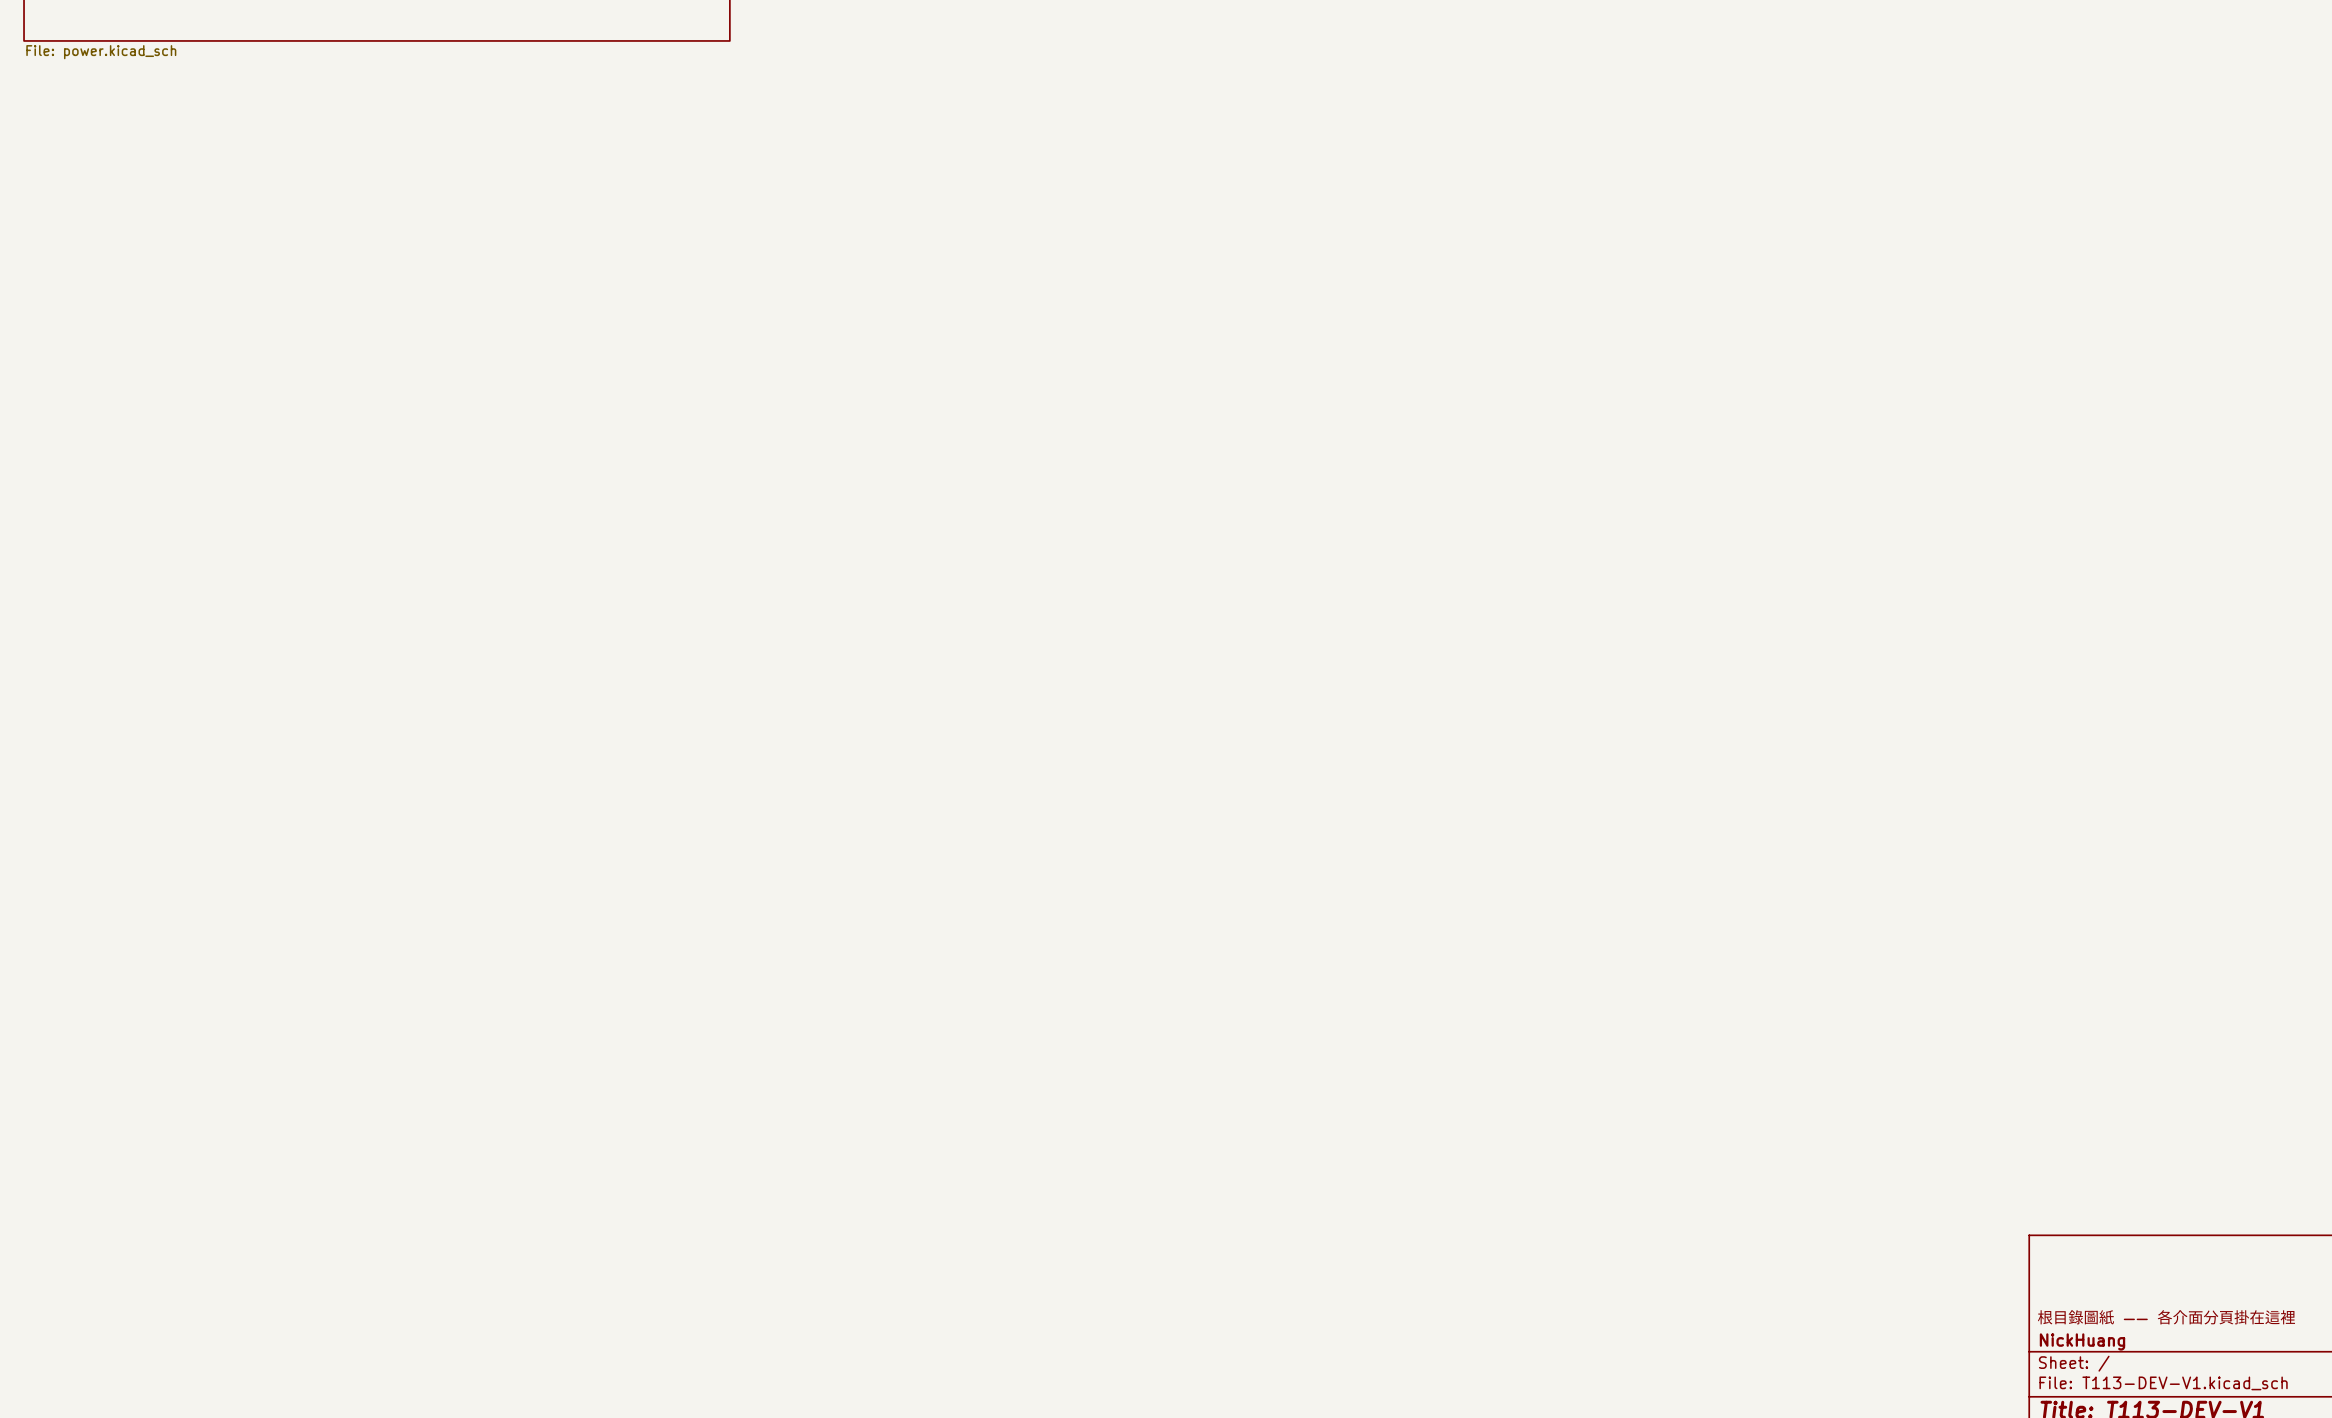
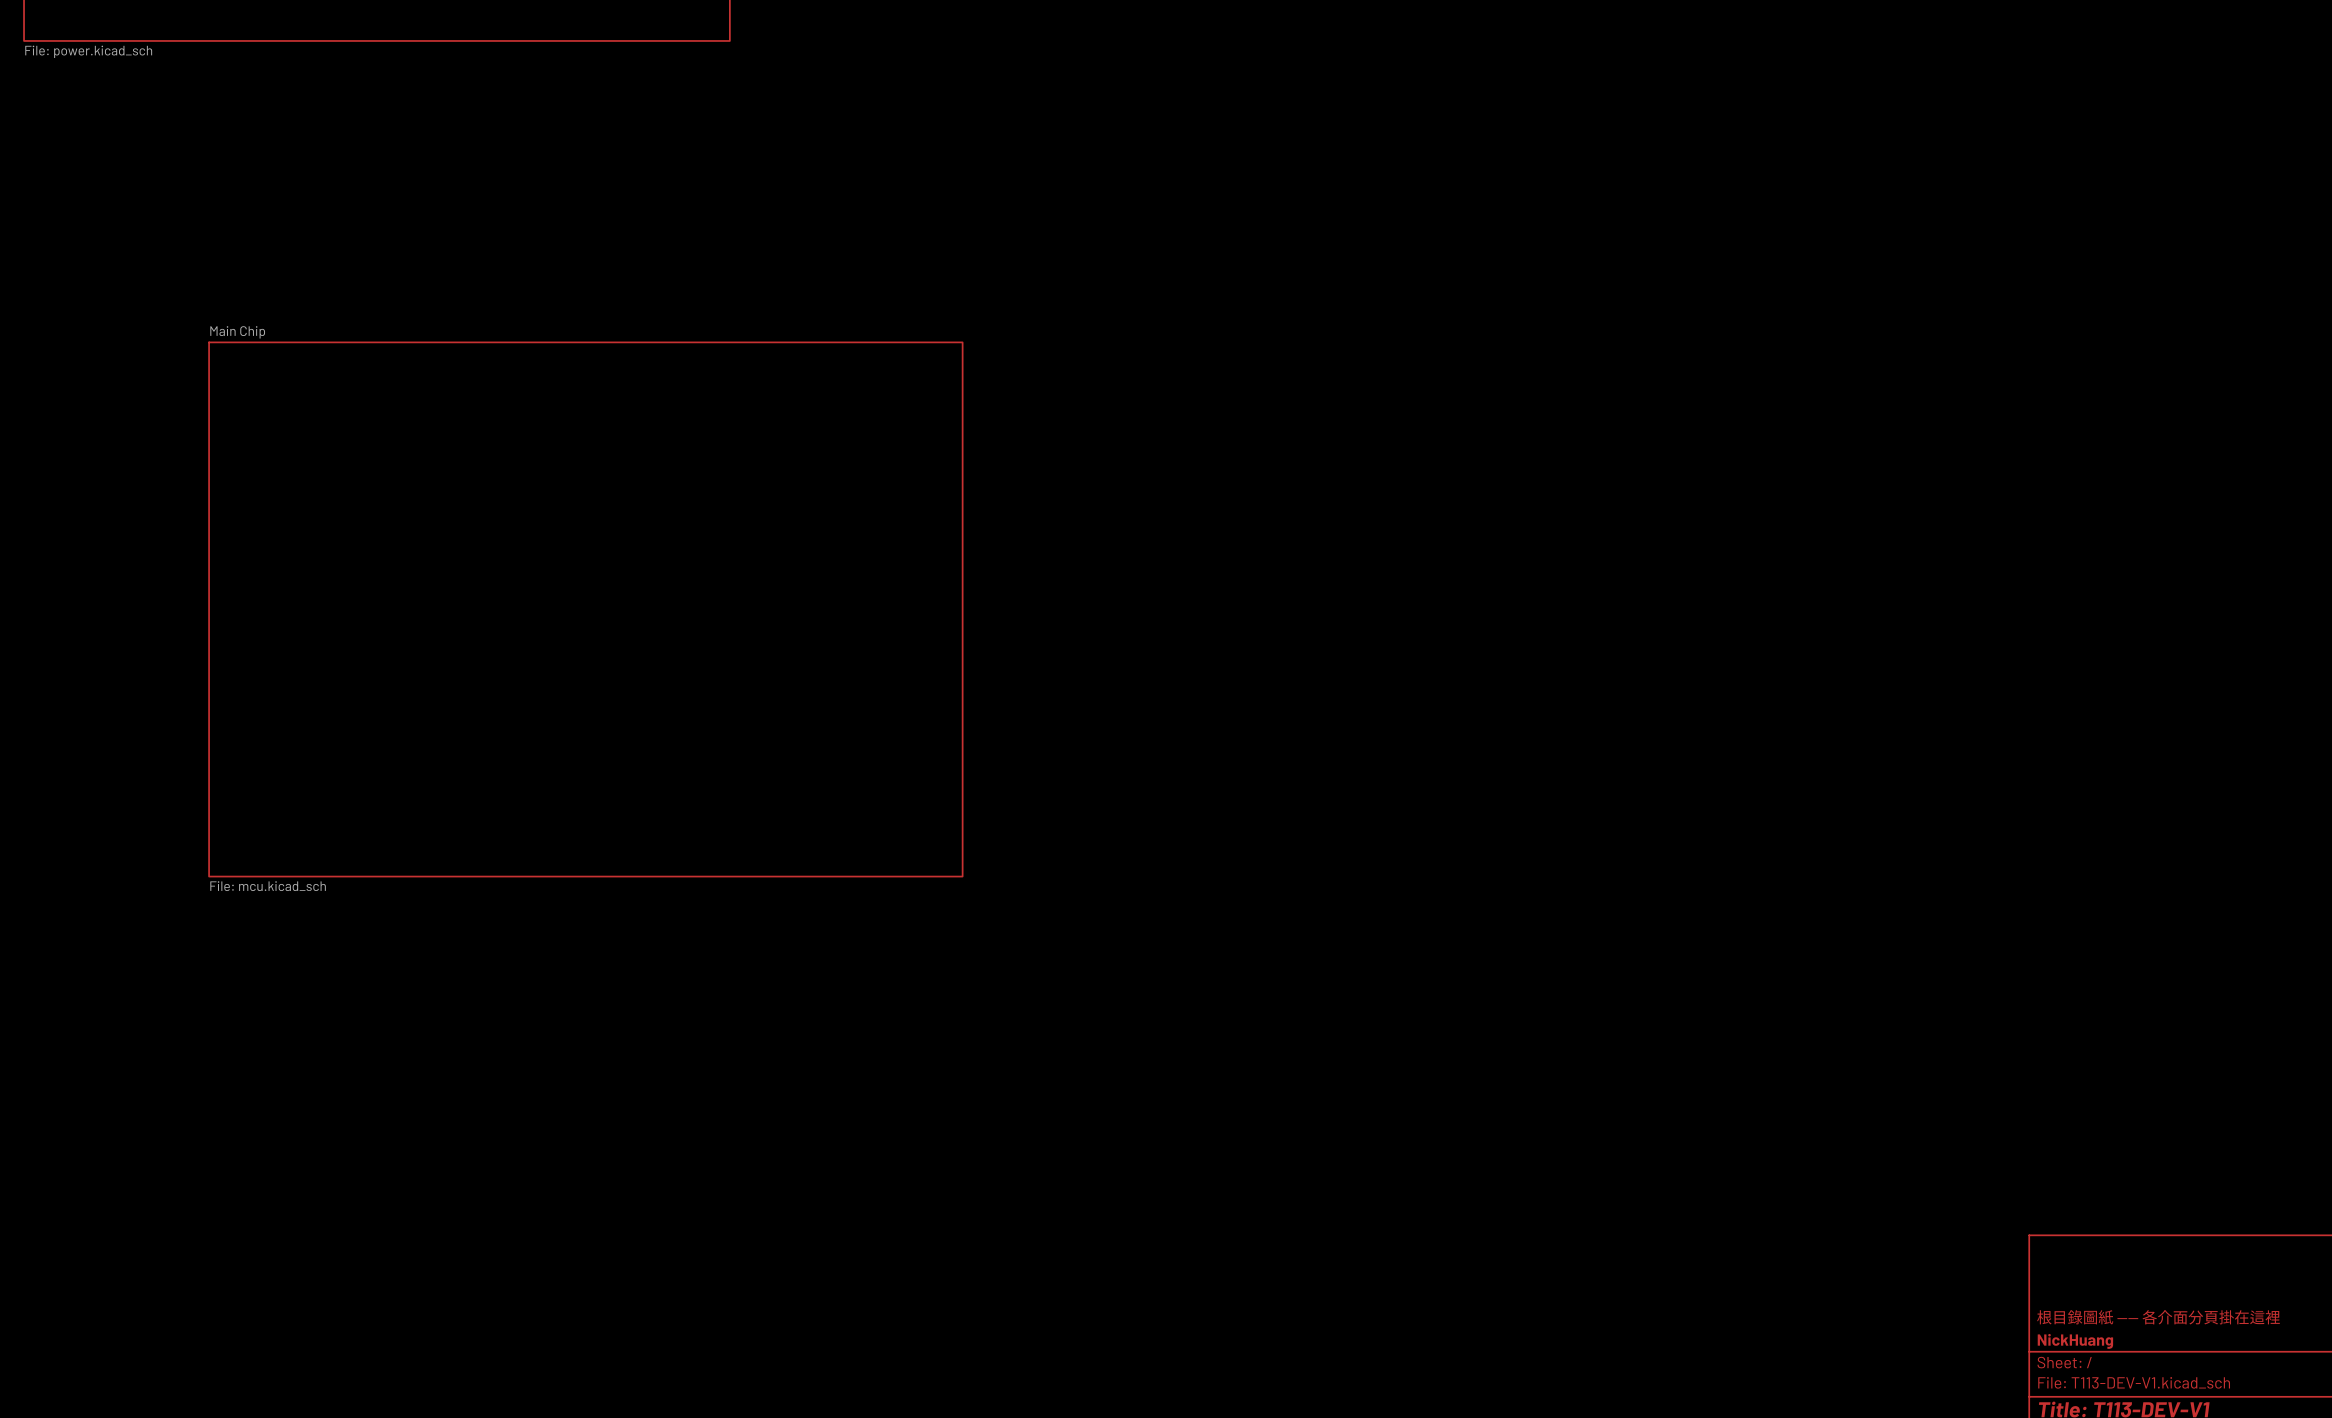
sheet Main Chip: none -> File: mcu.kicad_sch (585, 609)

